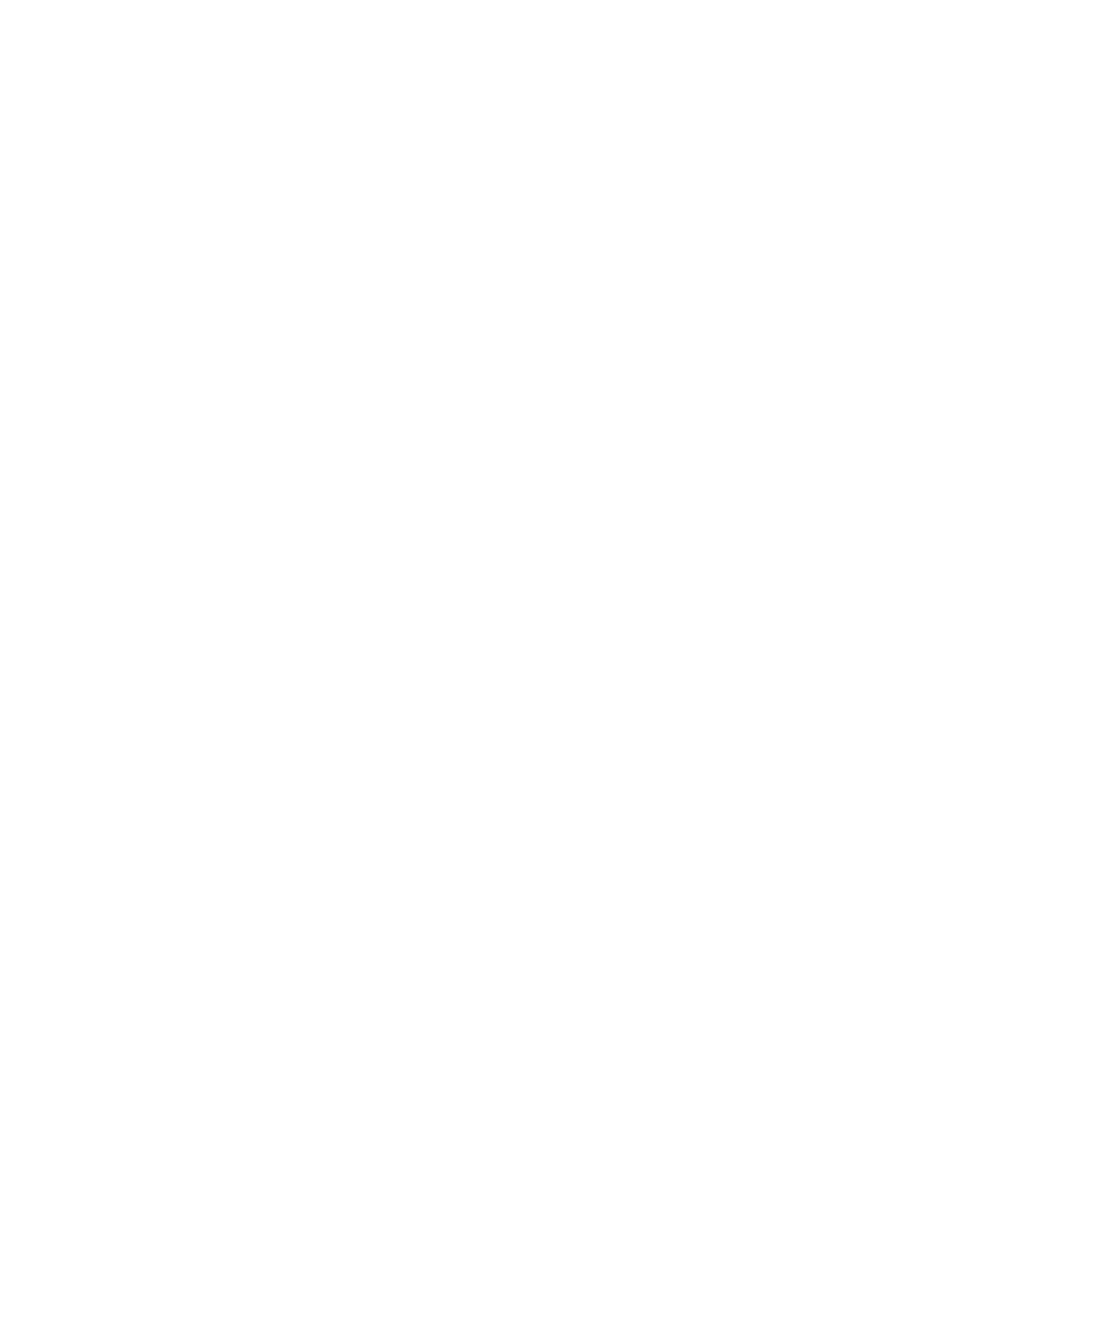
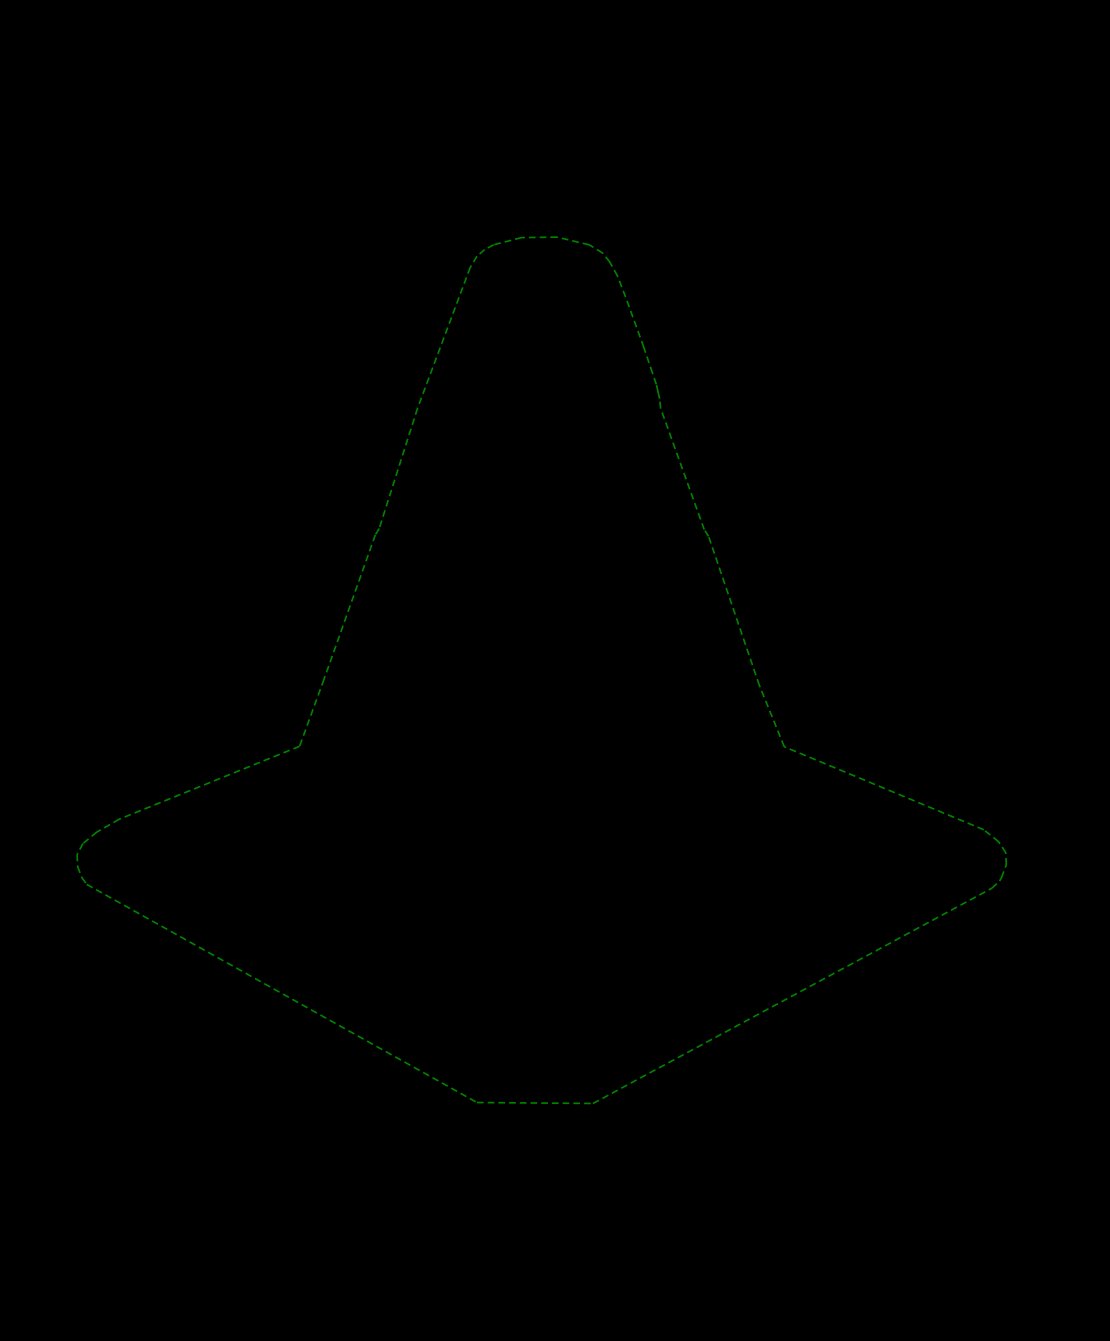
bottom zone outline: none -> (557, 237) (589, 244) (602, 252) (617, 275) (656, 384) (660, 408) (704, 529) (708, 536) (759, 685) (784, 746) (983, 829) (998, 841) (1005, 852) (1006, 864) (999, 881) (991, 888) (593, 1103) (476, 1102) (86, 884) (77, 866) (77, 854) (82, 843) (96, 832) (119, 819) (299, 746) (379, 528) (417, 408) (470, 267) (476, 256) (493, 244) (521, 237) (557, 237)

